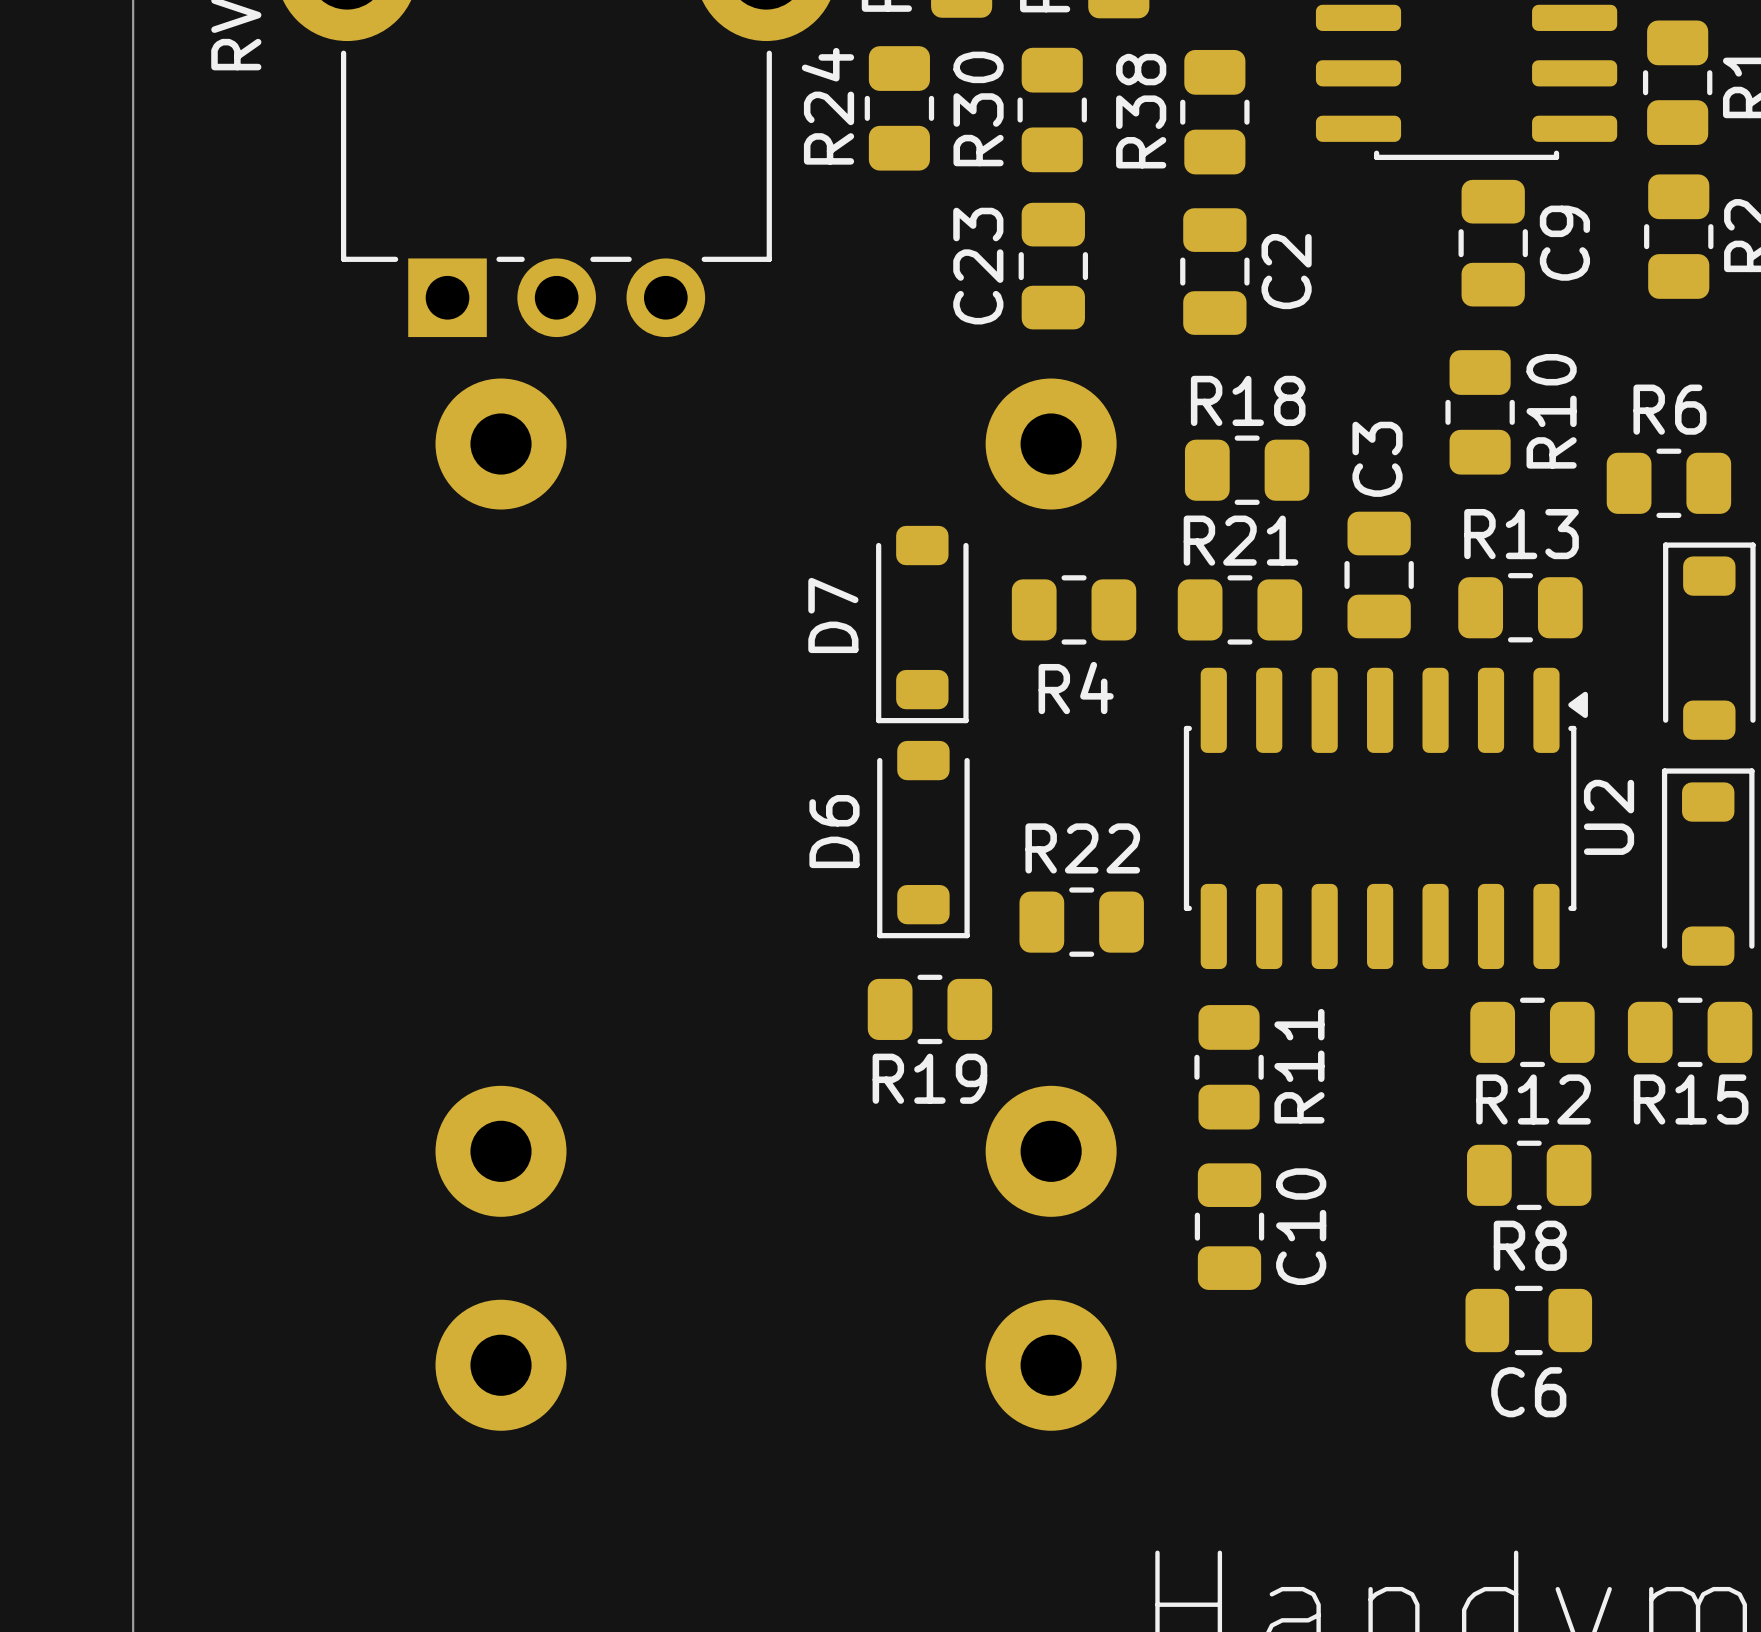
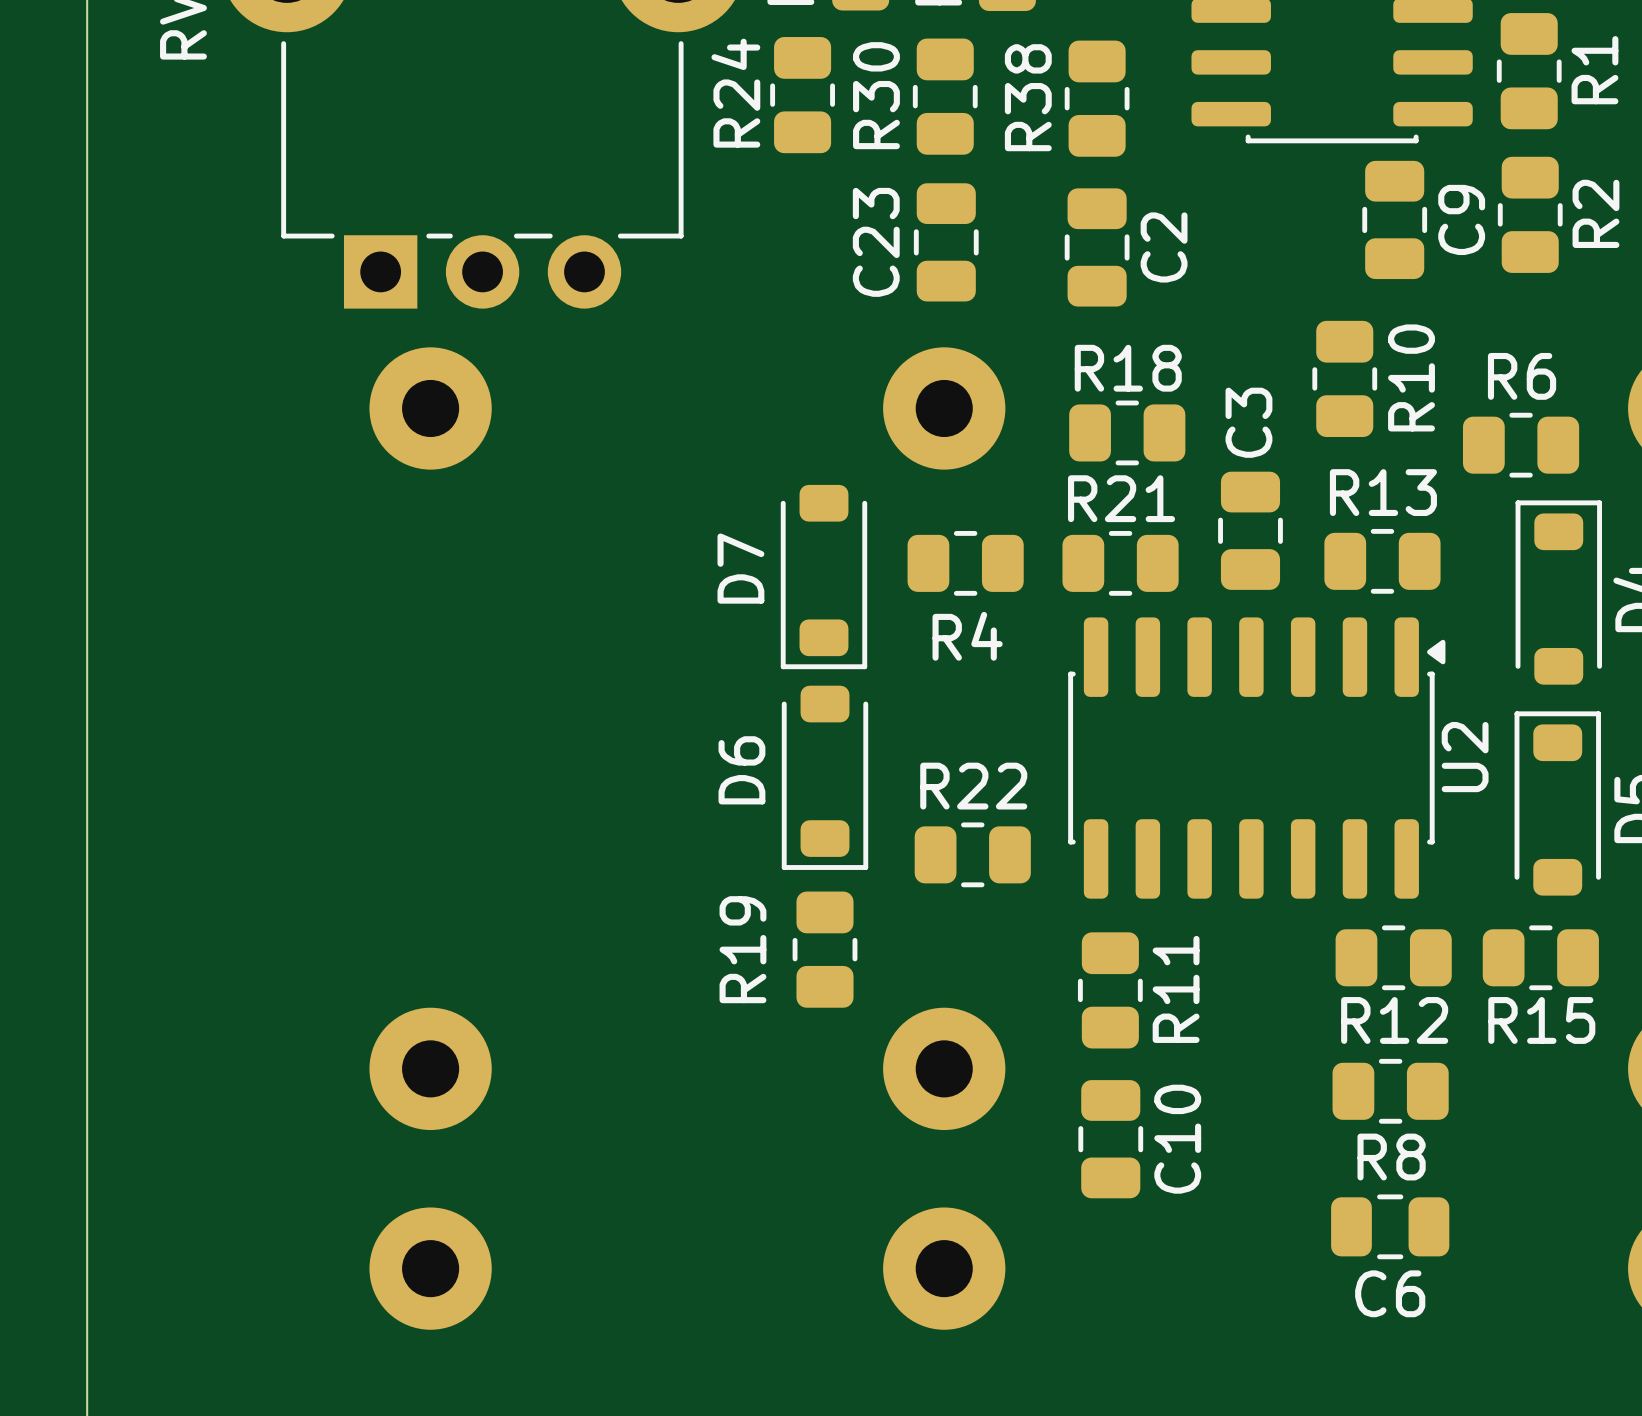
C9 position: (1493, 243) -> (1394, 219)
R19 rotation: 0° (929, 1009) -> 90° clockwise (825, 949)

